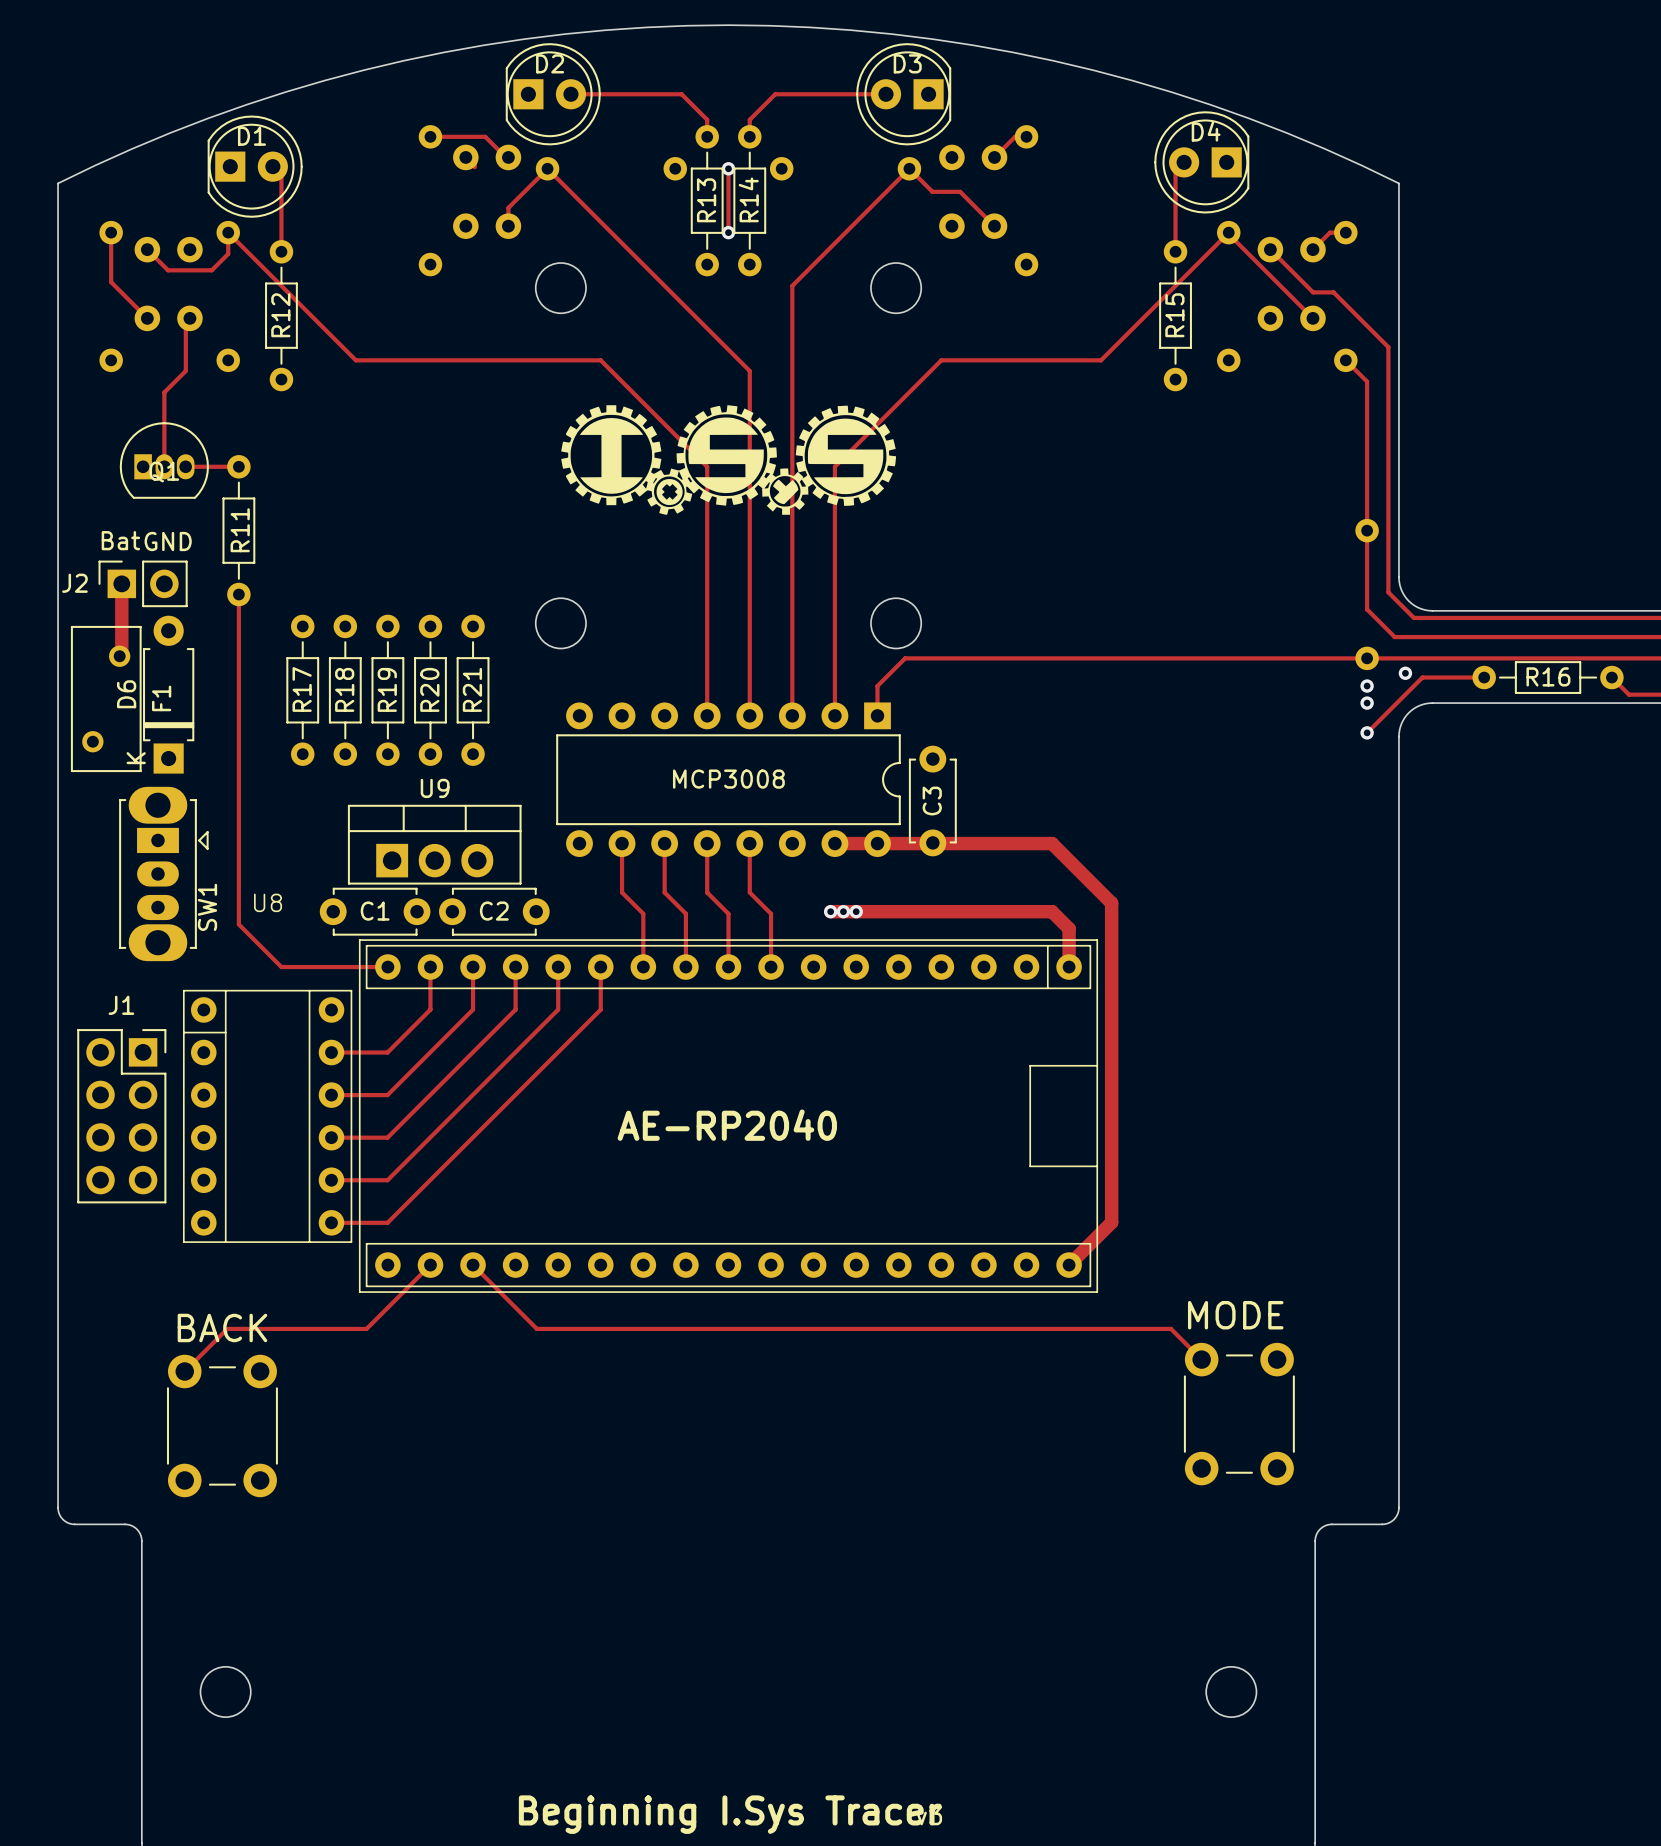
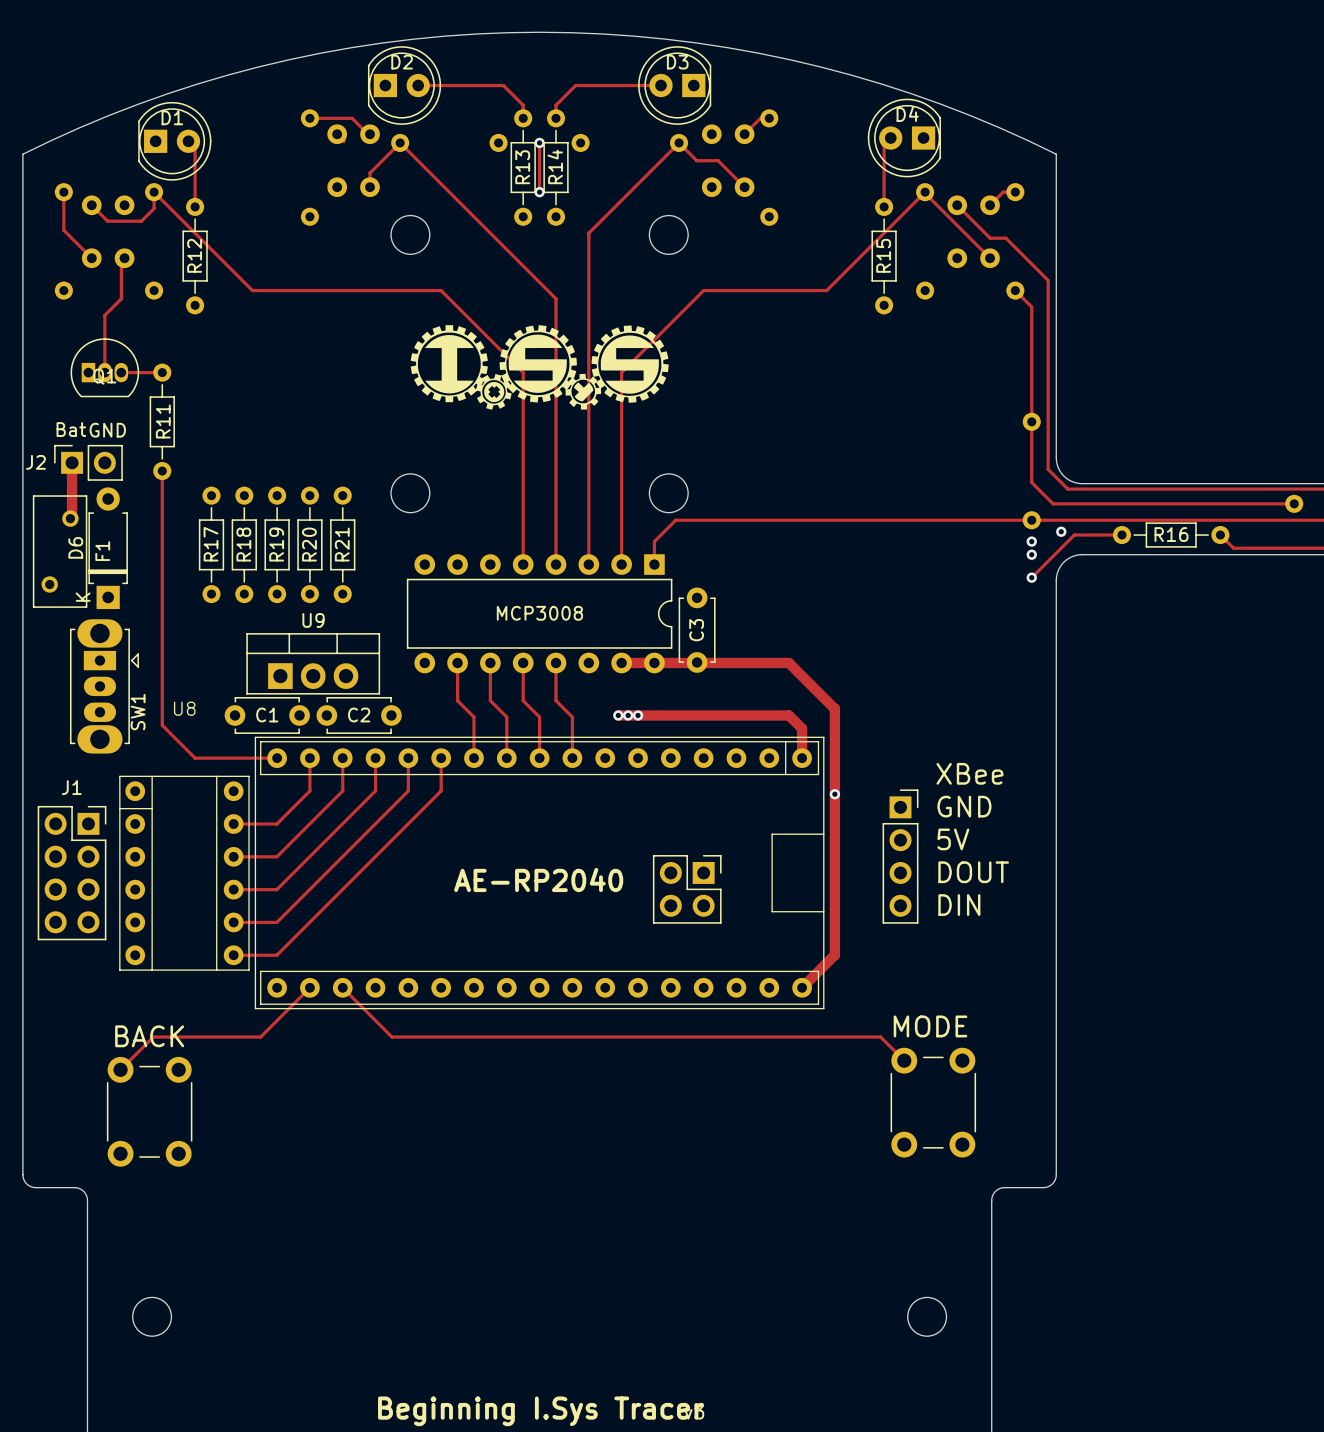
text: none -> XBee (969, 773)
via: none -> (834, 794)
text: none -> GND (964, 806)
text: none -> 5V (953, 839)
part: none -> (900, 856)
text: none -> DOUT (973, 872)
part: none -> (687, 889)
text: none -> DIN (959, 905)

